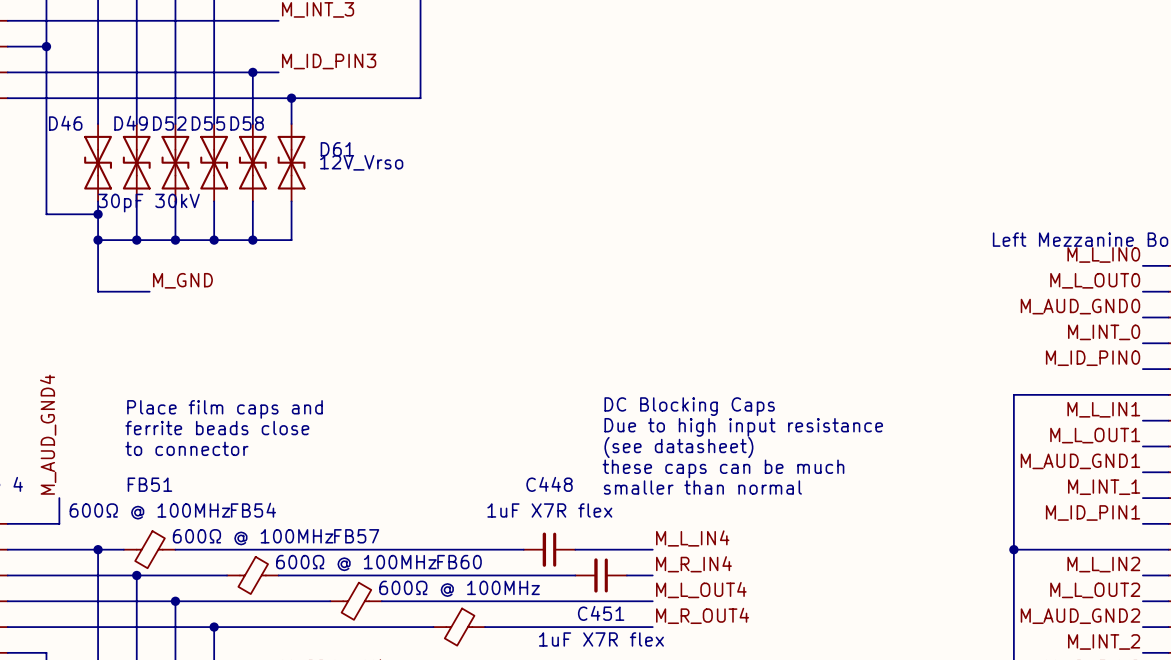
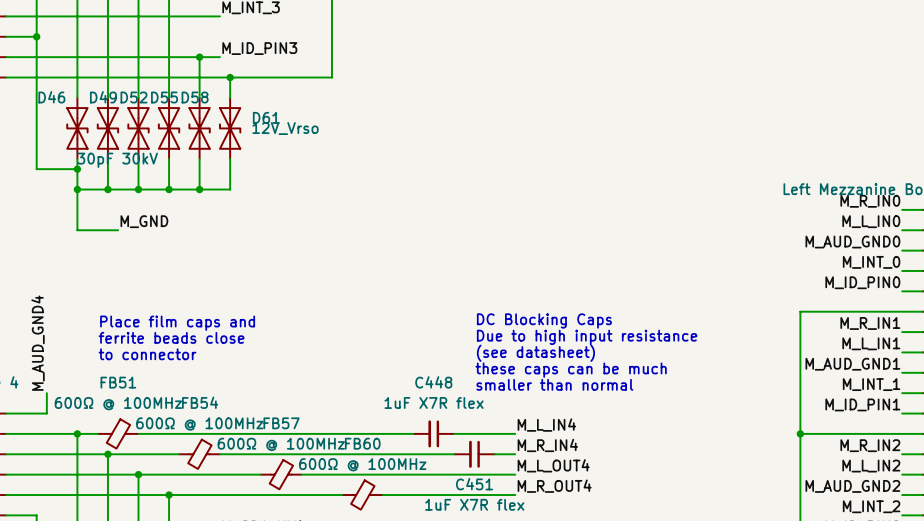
label: M_L_IN0 (1103, 254) -> M_R_IN0 (870, 201)
label: M_L_OUT0 (1095, 280) -> M_L_IN0 (871, 221)
label: M_L_IN1 (1103, 409) -> M_R_IN1 (870, 323)
label: M_L_OUT1 (1095, 435) -> M_L_IN1 (871, 343)
label: M_L_IN2 (1103, 564) -> M_R_IN2 (870, 445)
label: M_L_OUT2 (1095, 590) -> M_L_IN2 (871, 466)

